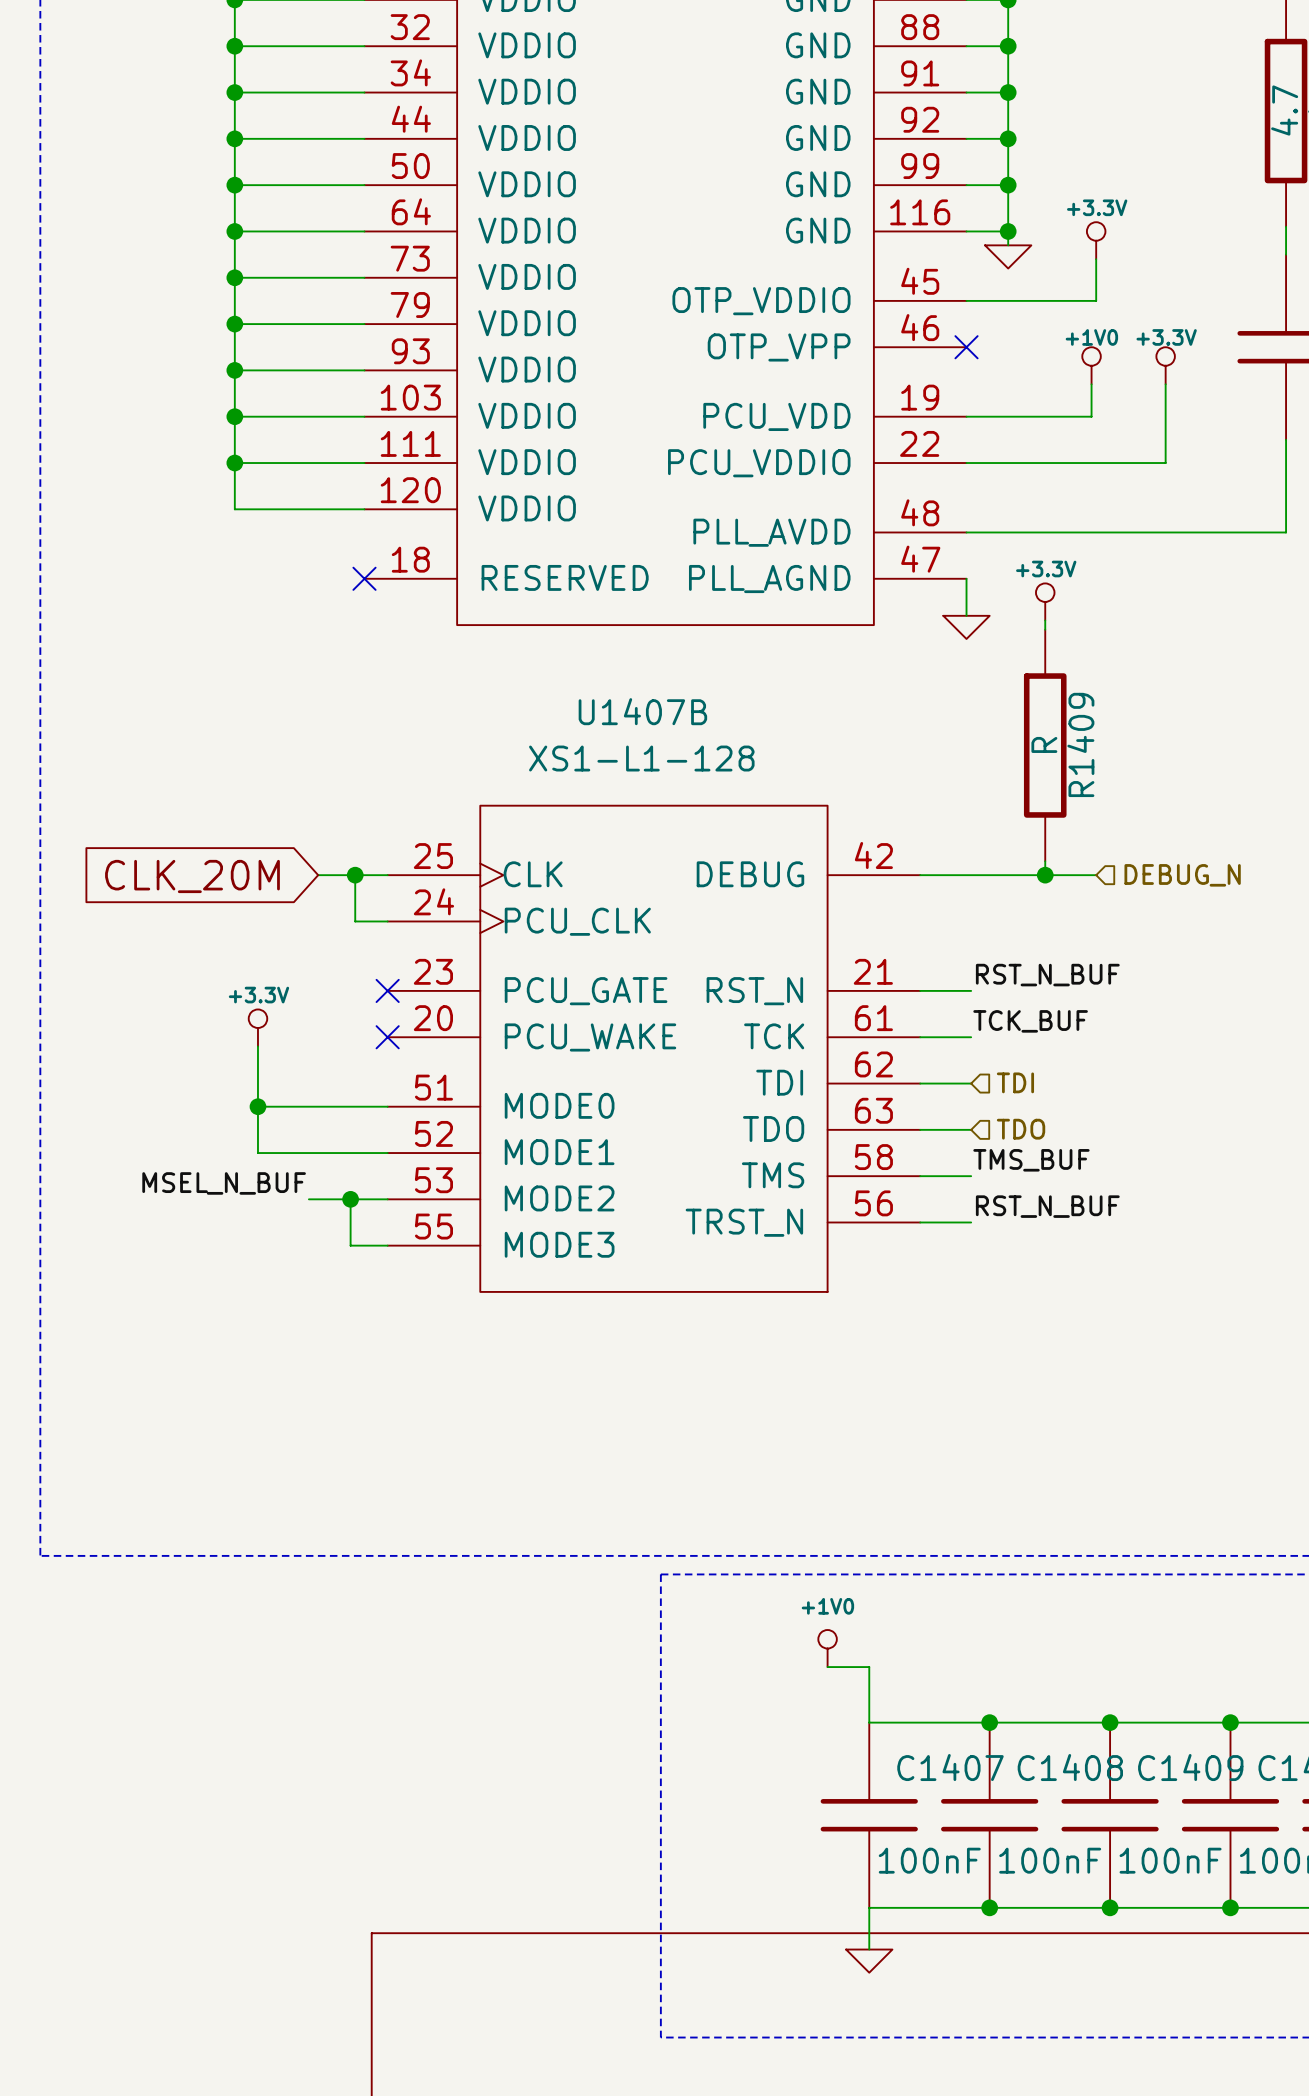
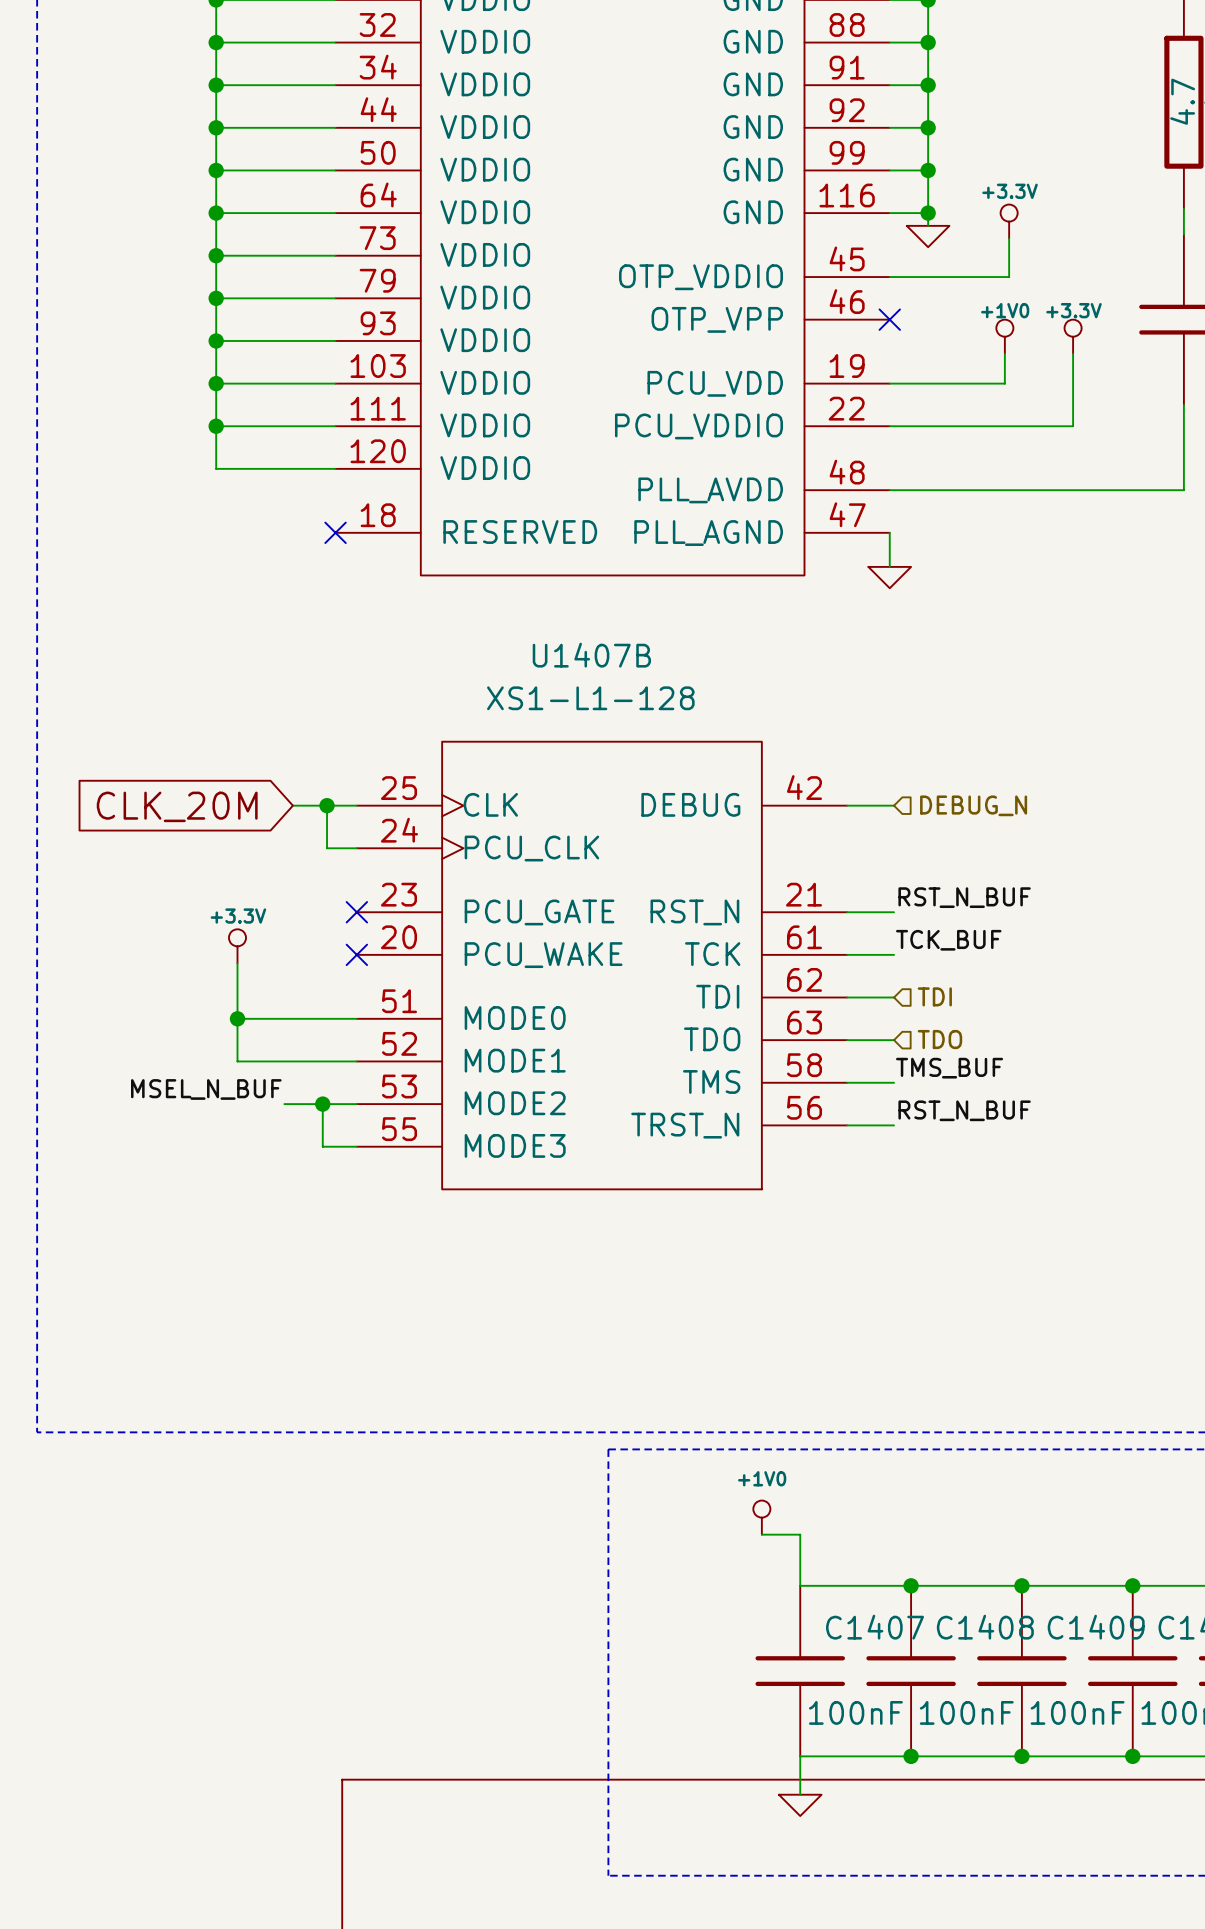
power symbol: +3.3V (1045, 601) -> none
wire: (1045, 620) (1045, 629) -> none
R1409: R (1045, 745) -> none
wire: (971, 875) (1096, 875) -> none
junction: (1045, 875) -> none
hierarchical label position: DEBUG_N (1182, 875) -> DEBUG_N (973, 805)

